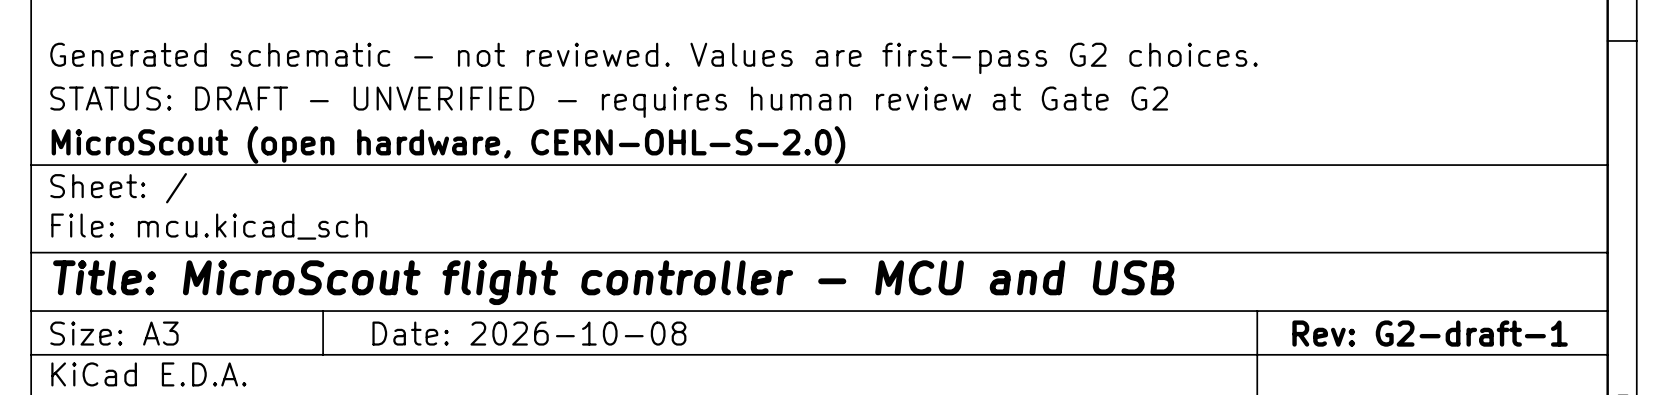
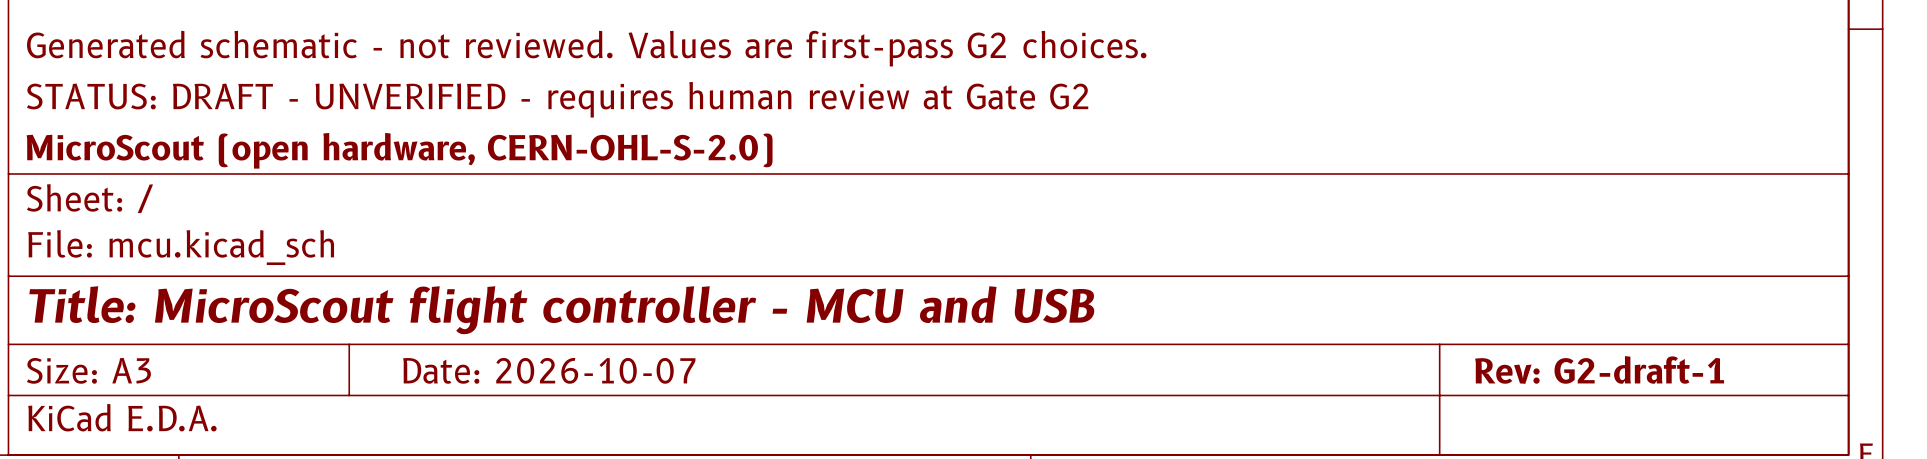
title block: Date: 2026-10-08 (529, 333) -> Date: 2026-10-07 (549, 370)

